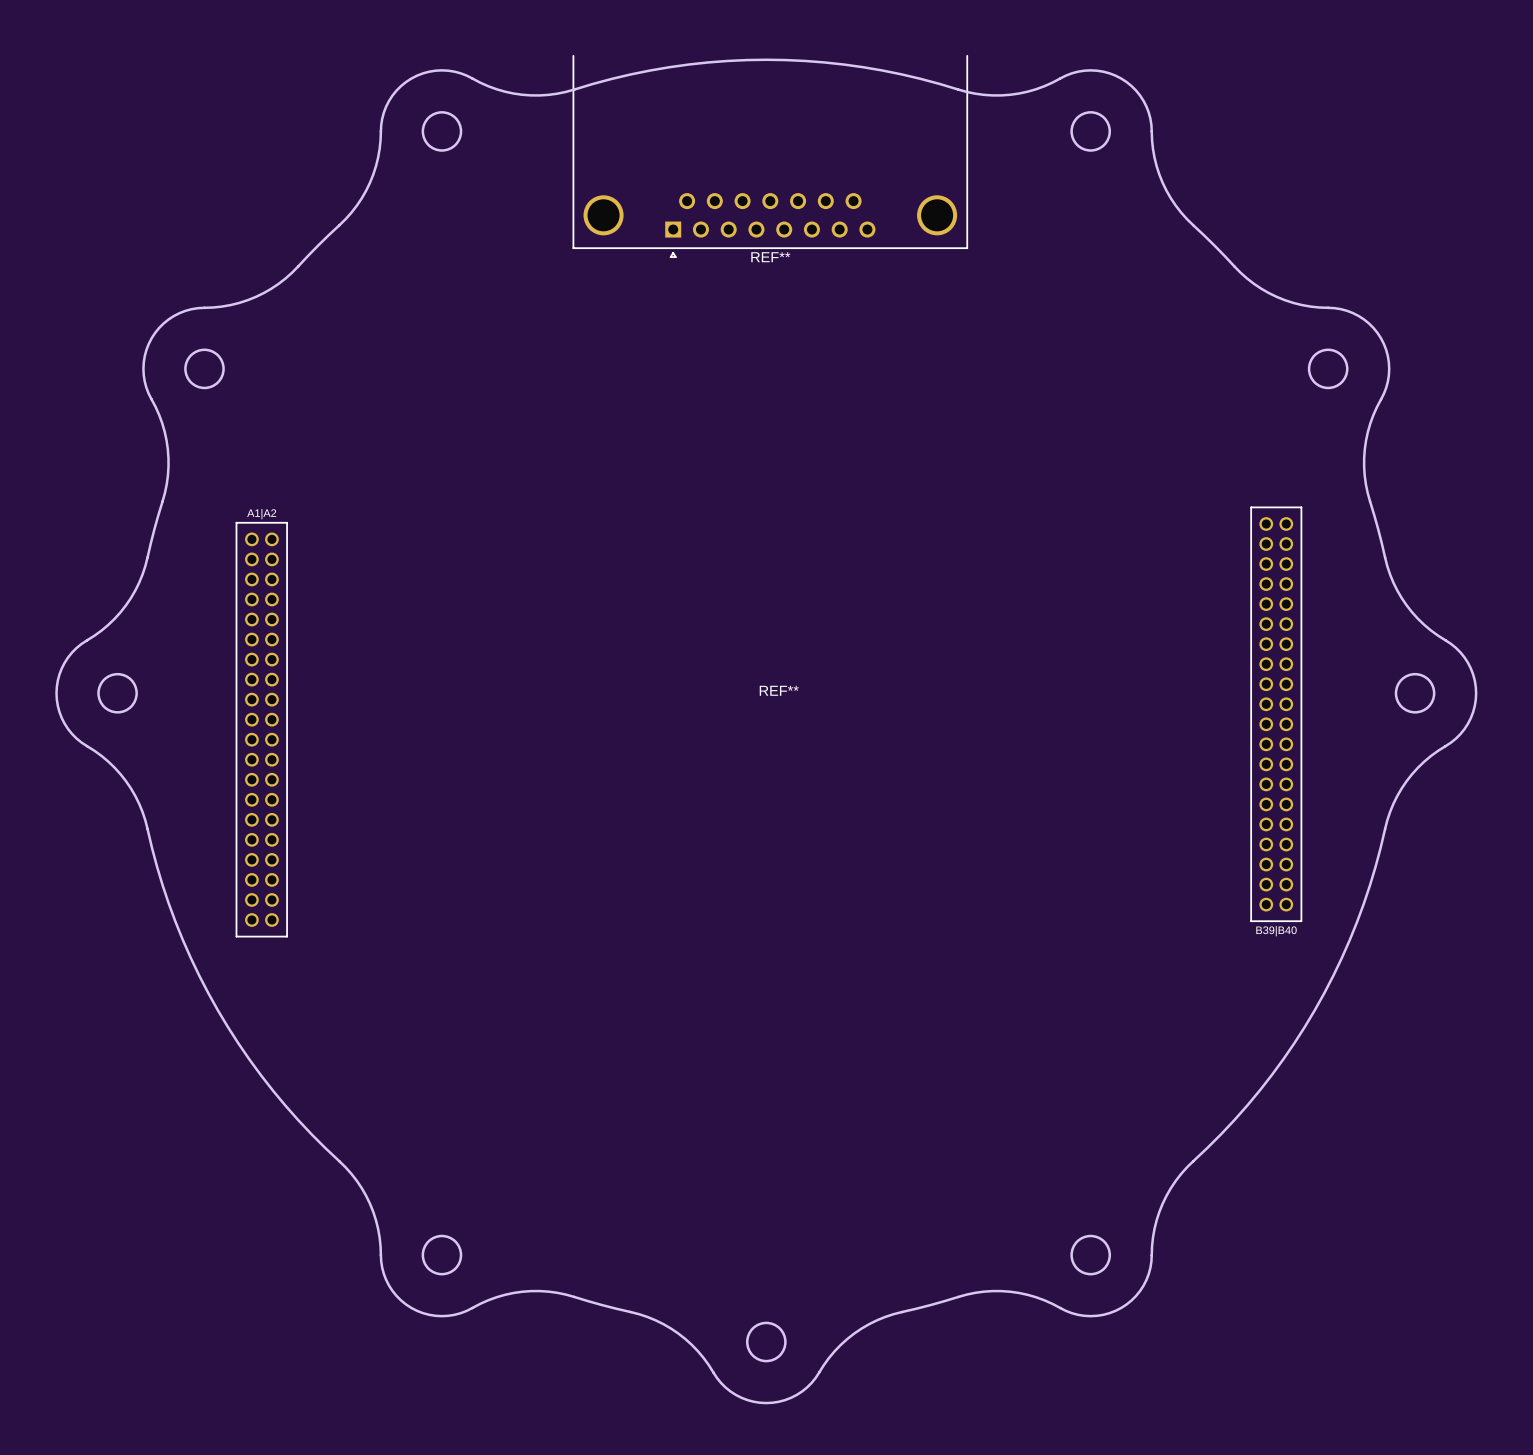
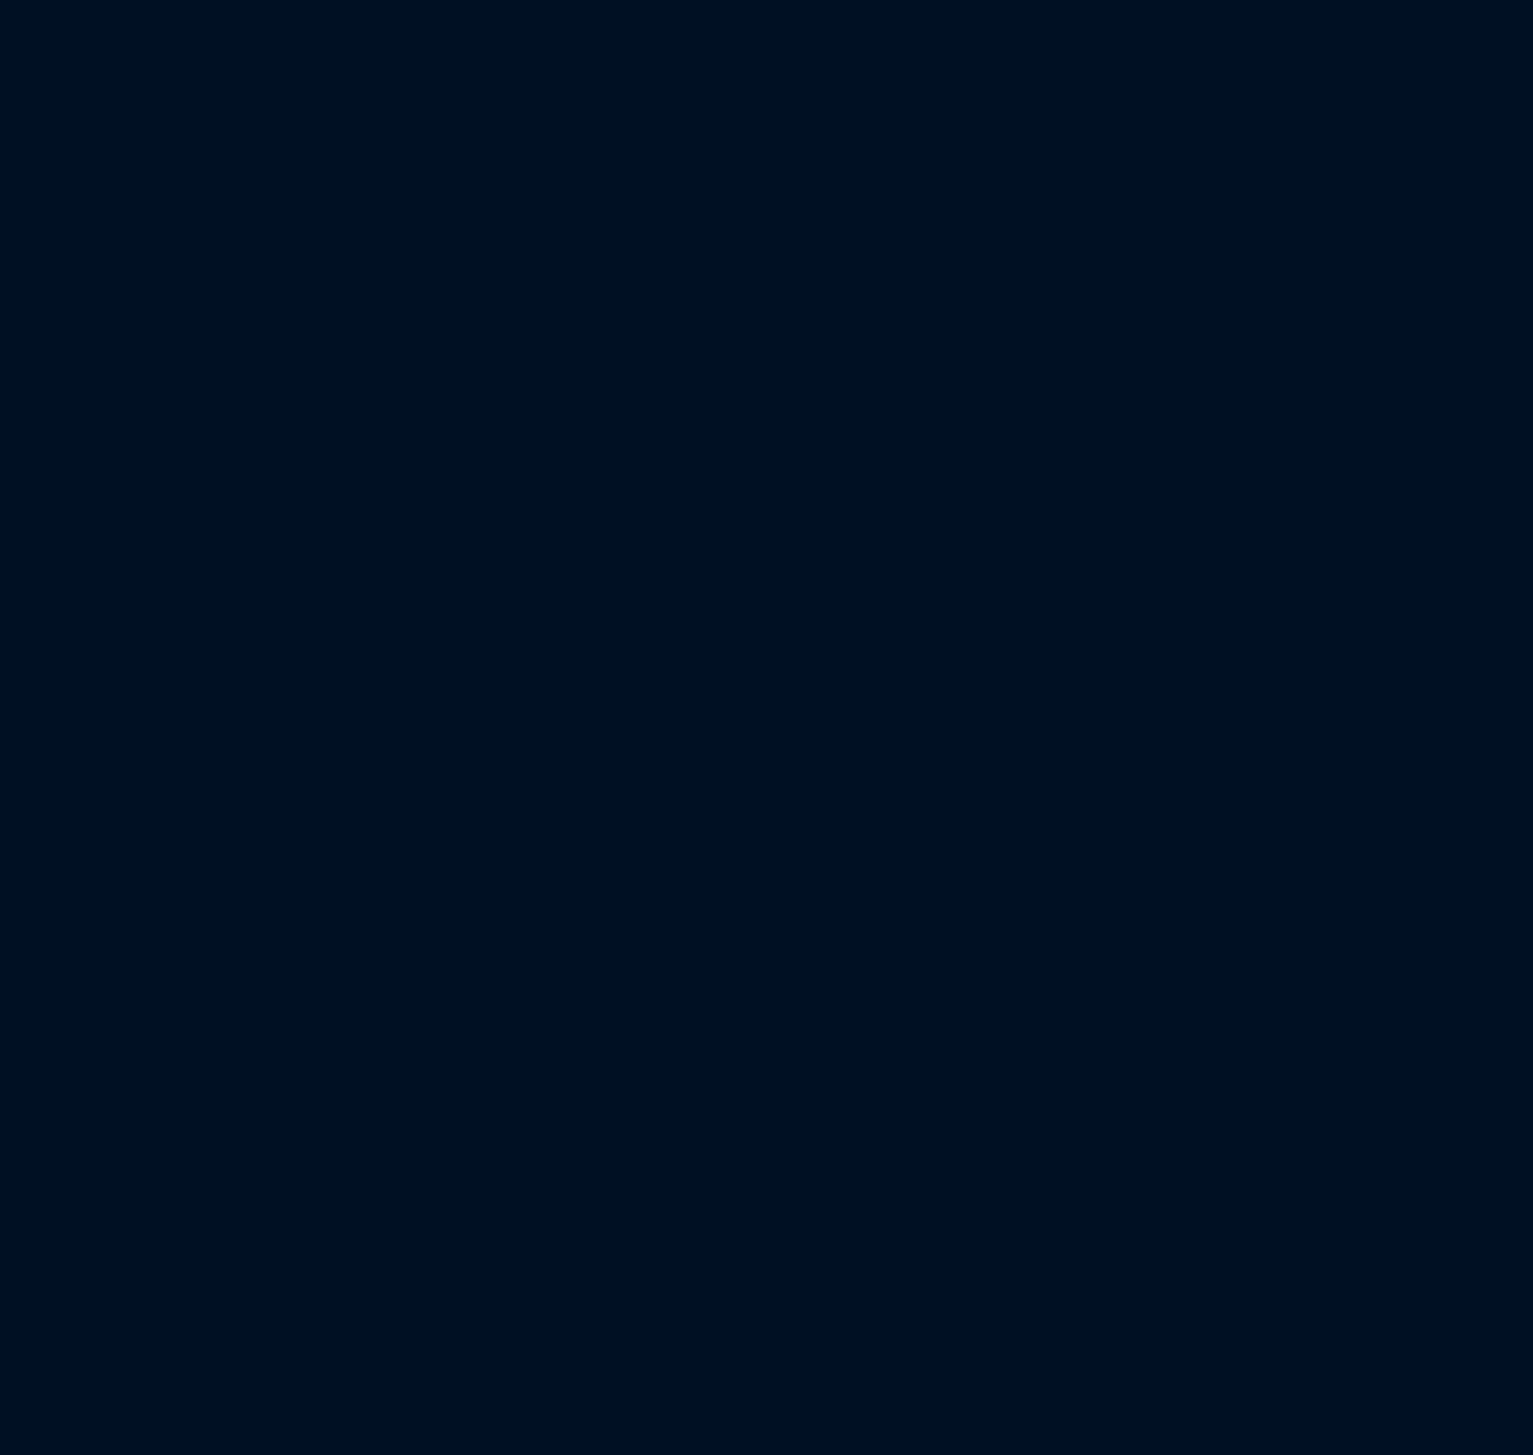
REF**: (770, 156) -> none
REF**: (766, 731) -> none

